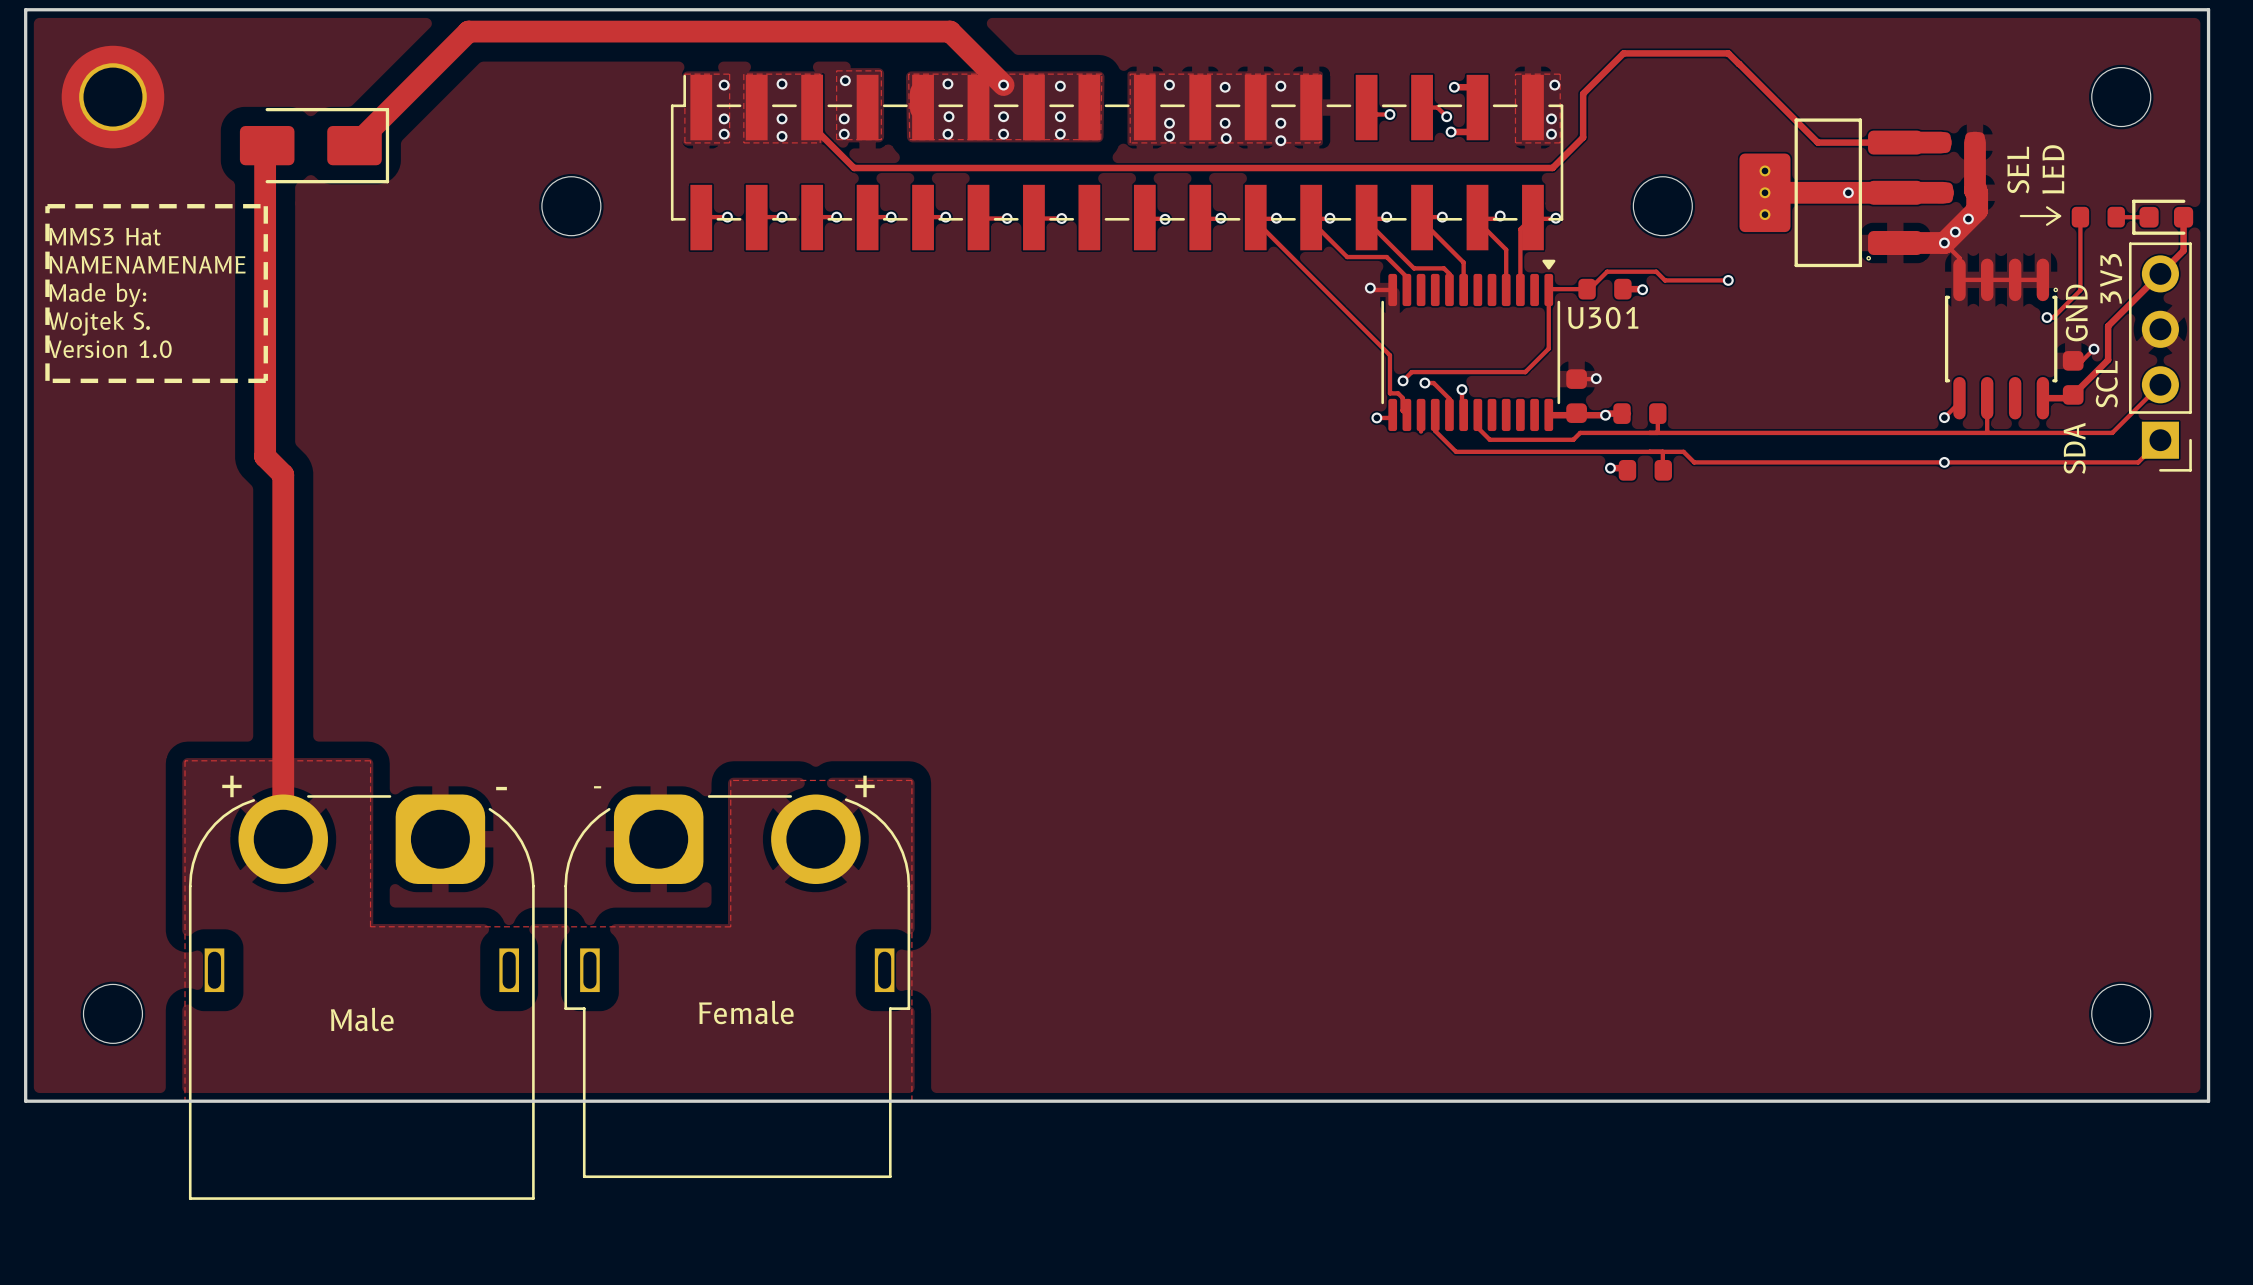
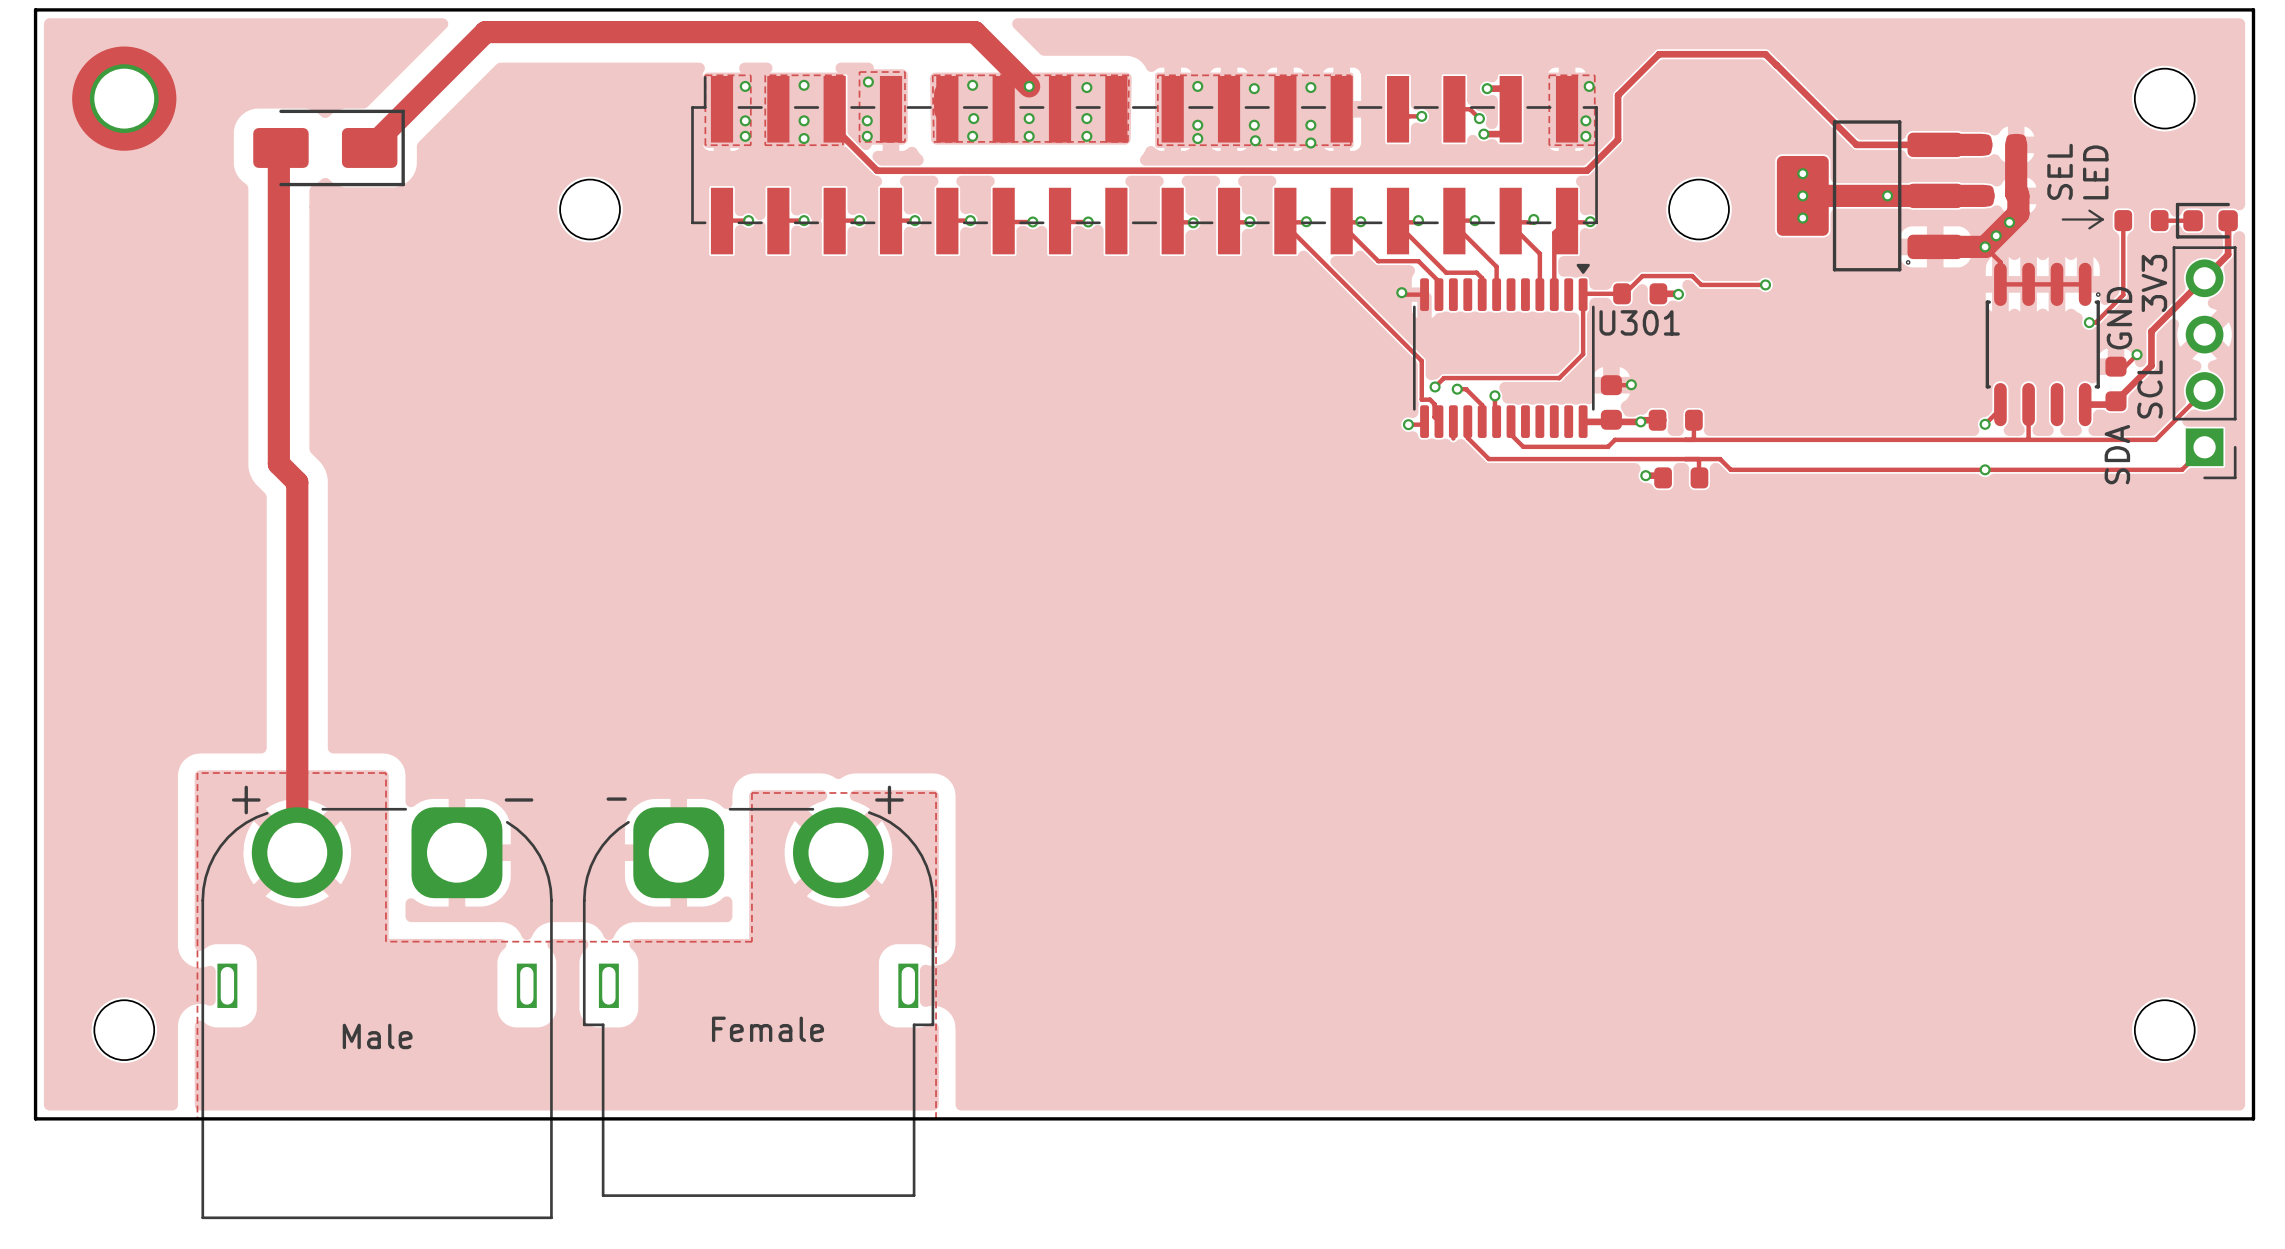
line: (47, 206) (265, 206) (265, 380) (47, 380) (47, 206) -> none
text: MMS3 Hat (105, 236) -> none
text: NAMENAMENAME (147, 264) -> none
text: Made by: (97, 295) -> none
text: Wojtek S. (99, 323) -> none
text: Version 1.0 (109, 349) -> none

